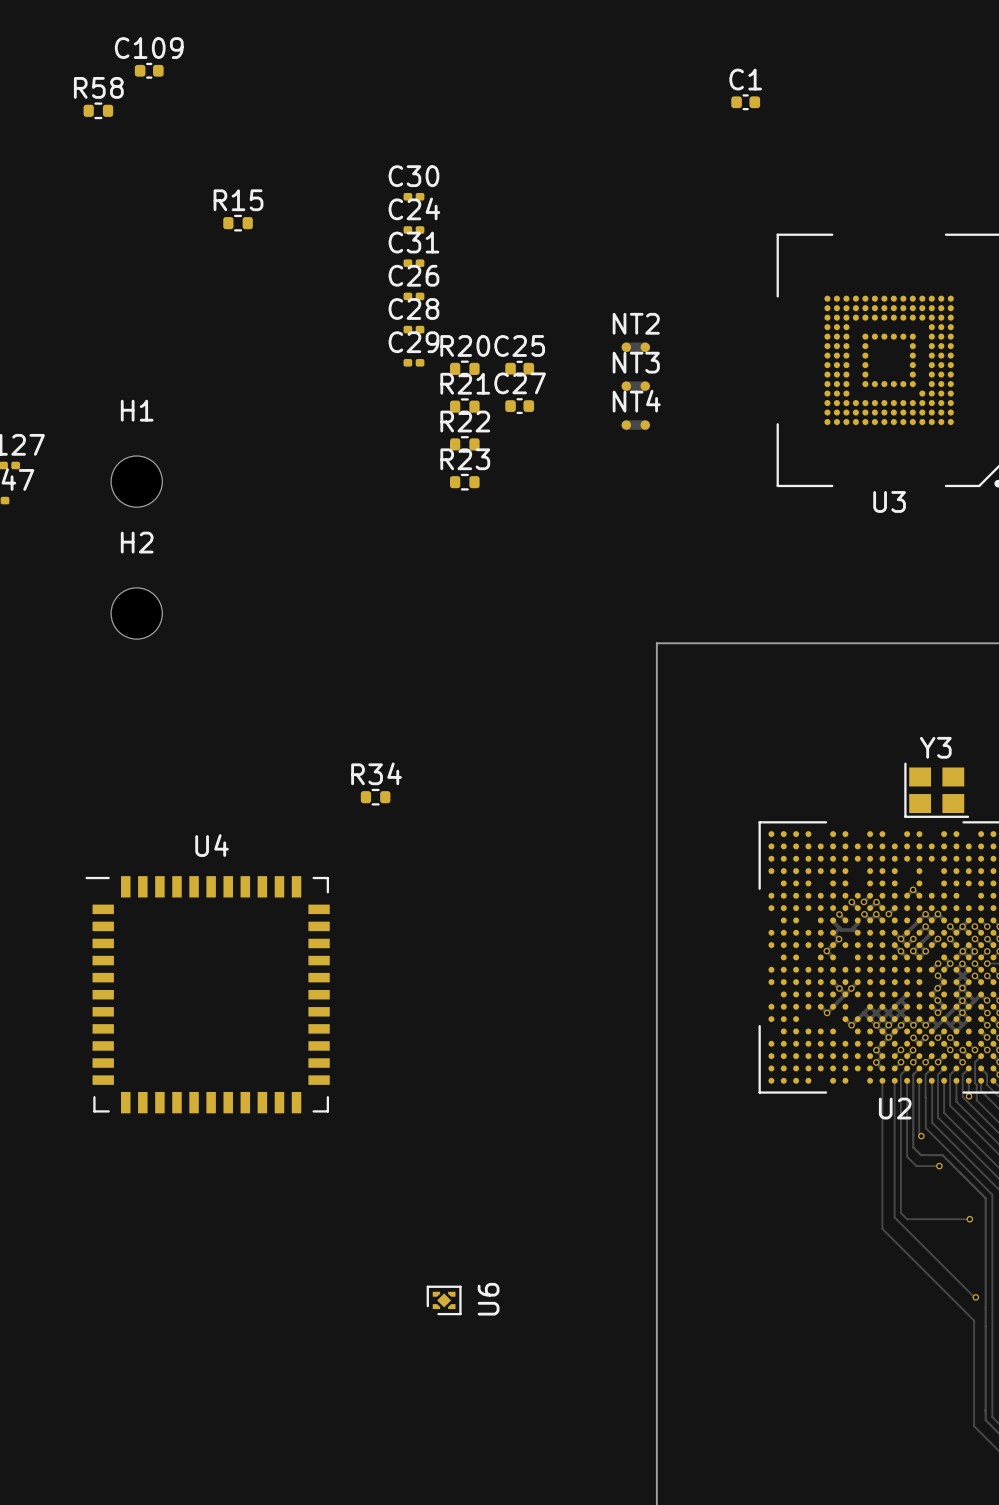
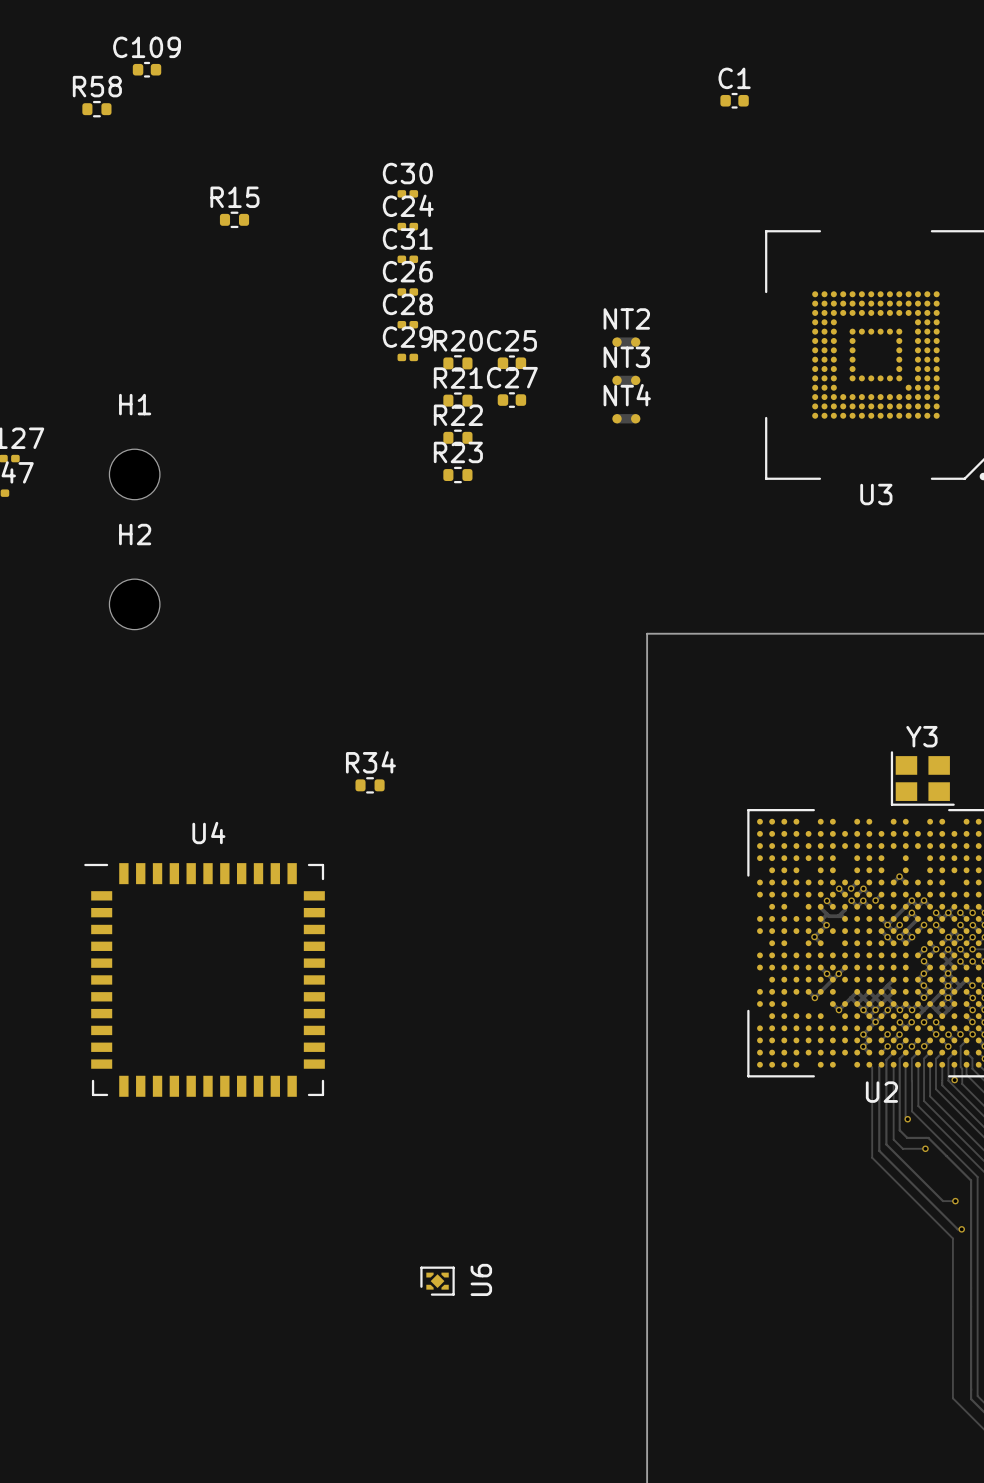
track: (900, 1074) (900, 1212) (907, 1219) (957, 1219) -> (887, 1058) (886, 1144) (943, 1201)
track: (882, 1080) (882, 1228) (974, 1320) (974, 1426) -> (869, 1064) (872, 1067) (872, 1157) (952, 1238) (952, 1398) (959, 1405)
track: (894, 1080) (894, 1217) (975, 1297) -> (881, 1064) (879, 1066) (879, 1150) (957, 1229) (961, 1229)
via position: (975, 1297) -> (961, 1229)

